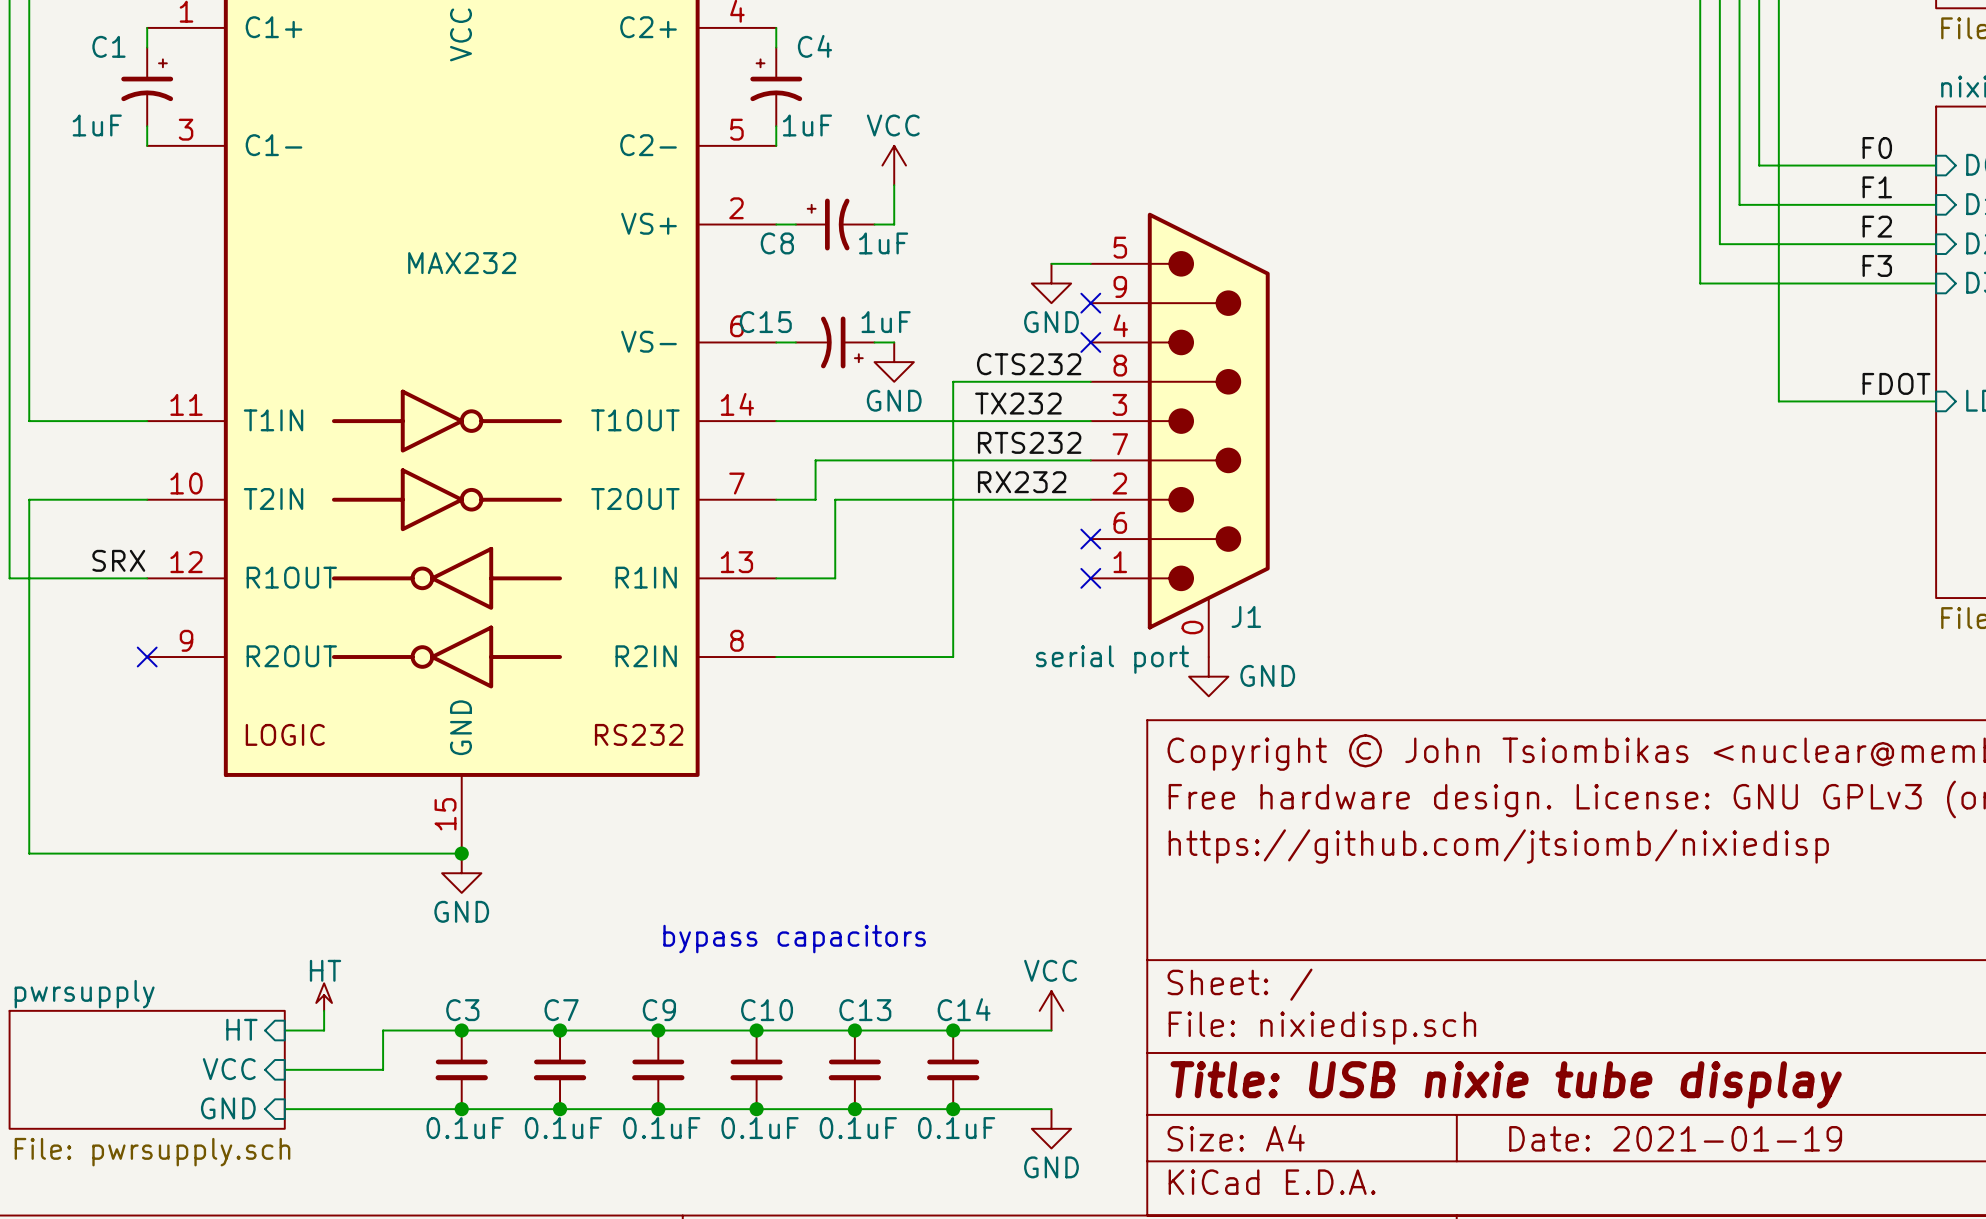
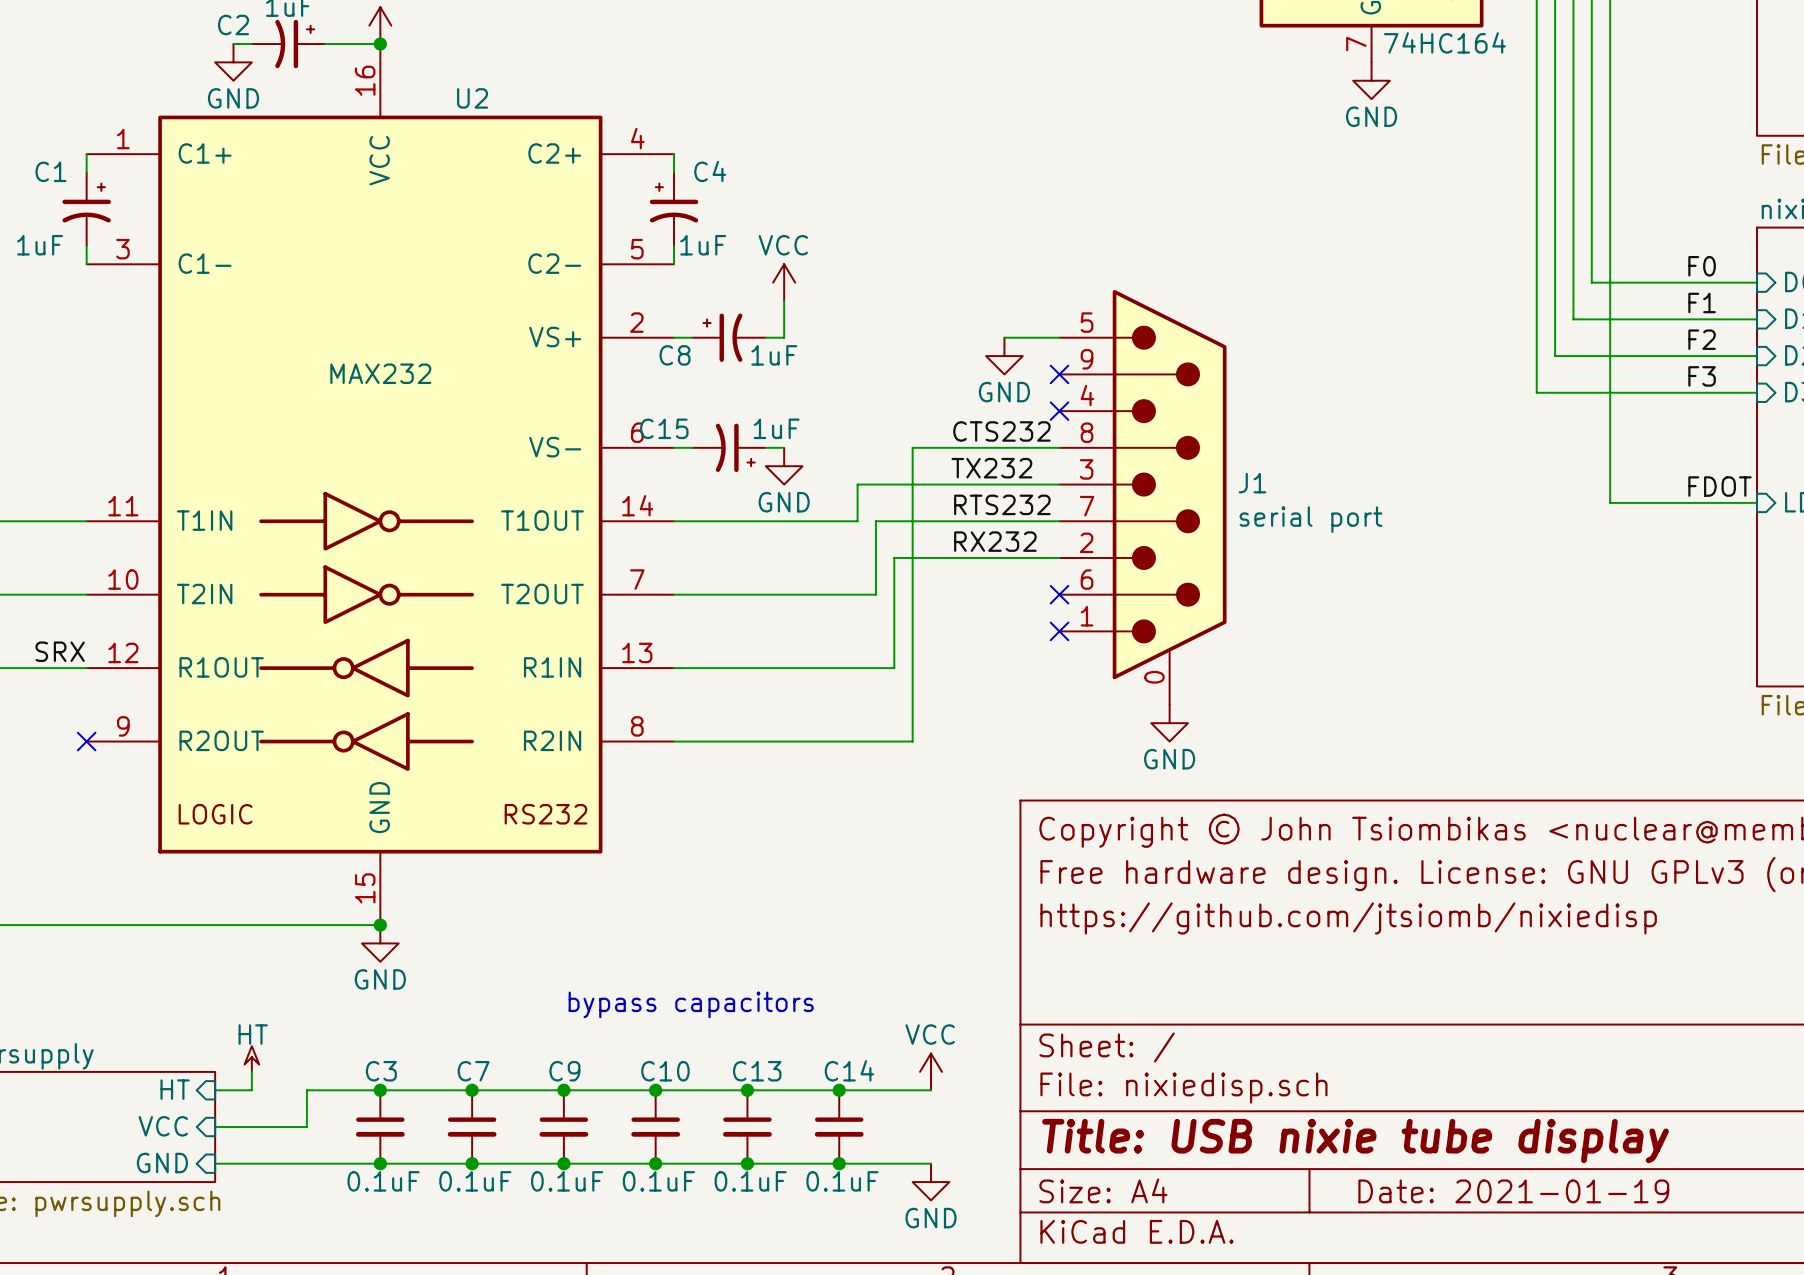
wire: none -> (1004, 337) (1059, 337)
wire: (1051, 263) (1090, 263) -> none
no-connect mark: none -> (1059, 374)
power symbol position: GND (1051, 283) -> GND (1004, 356)
no-connect mark: (1090, 303) -> none
no-connect mark: none -> (1059, 411)
no-connect mark: (1090, 342) -> none
label position: CTS232 (1029, 364) -> CTS232 (1001, 431)
wire: (972, 381) (953, 381) (953, 657) -> (1059, 447) (912, 447) (912, 741) (839, 741)
label position: TX232 (1018, 403) -> TX232 (991, 468)
wire: (972, 421) (992, 421) -> (857, 521) (857, 484)
J1 position: (1180, 434) -> (1143, 497)
label position: RTS232 (1029, 442) -> RTS232 (1002, 504)
wire: (1012, 460) (815, 460) (815, 499) -> (894, 557) (894, 668) (729, 668)
label position: RX232 (1022, 482) -> RX232 (995, 541)
wire: (835, 499) (835, 578) -> (729, 594) (710, 594)
wire: (992, 499) (1090, 499) -> (875, 594) (875, 521)
no-connect mark: none -> (1059, 594)
no-connect mark: (1090, 539) -> none
no-connect mark: none -> (1059, 631)
no-connect mark: (1090, 578) -> none
J1 name position: J1 (1246, 616) -> J1 (1252, 483)
J1 value position: serial port (1112, 659) -> serial port (1311, 519)
power symbol text position: GND (1267, 675) -> GND (1169, 759)
power symbol position: GND (1208, 676) -> GND (1169, 723)

